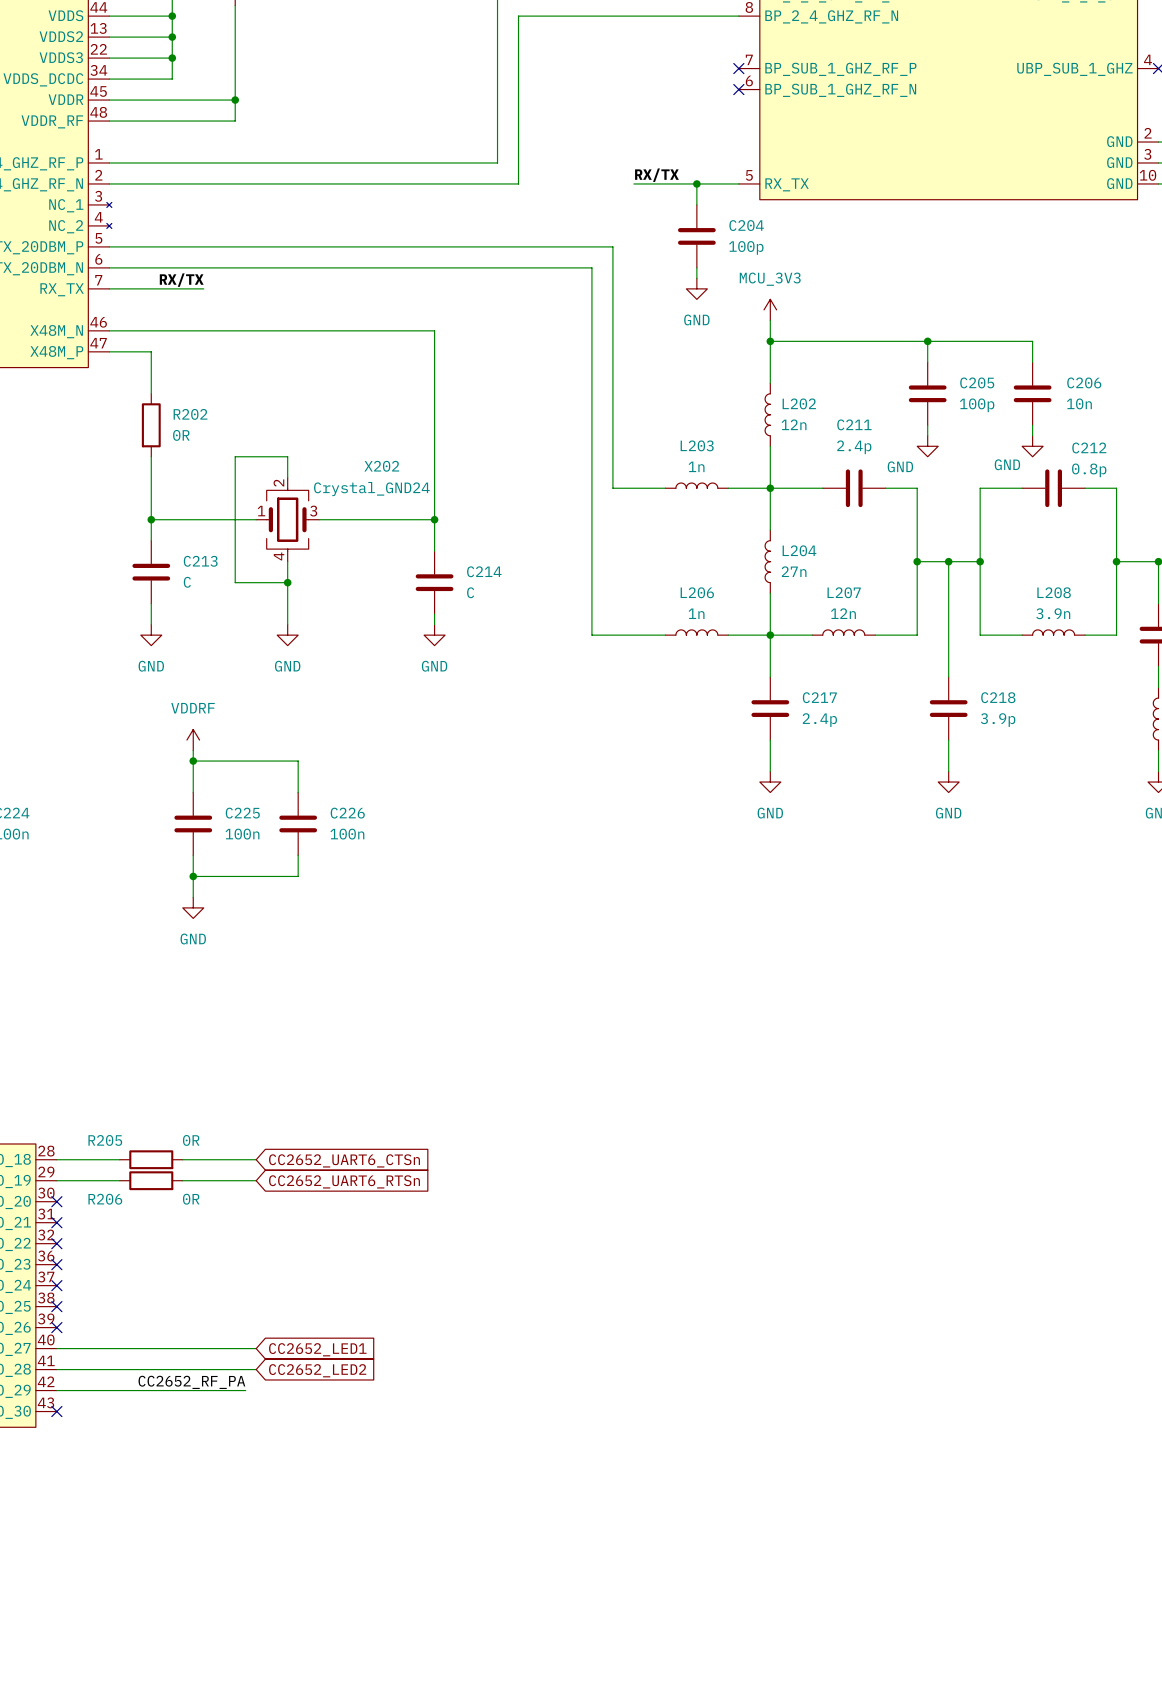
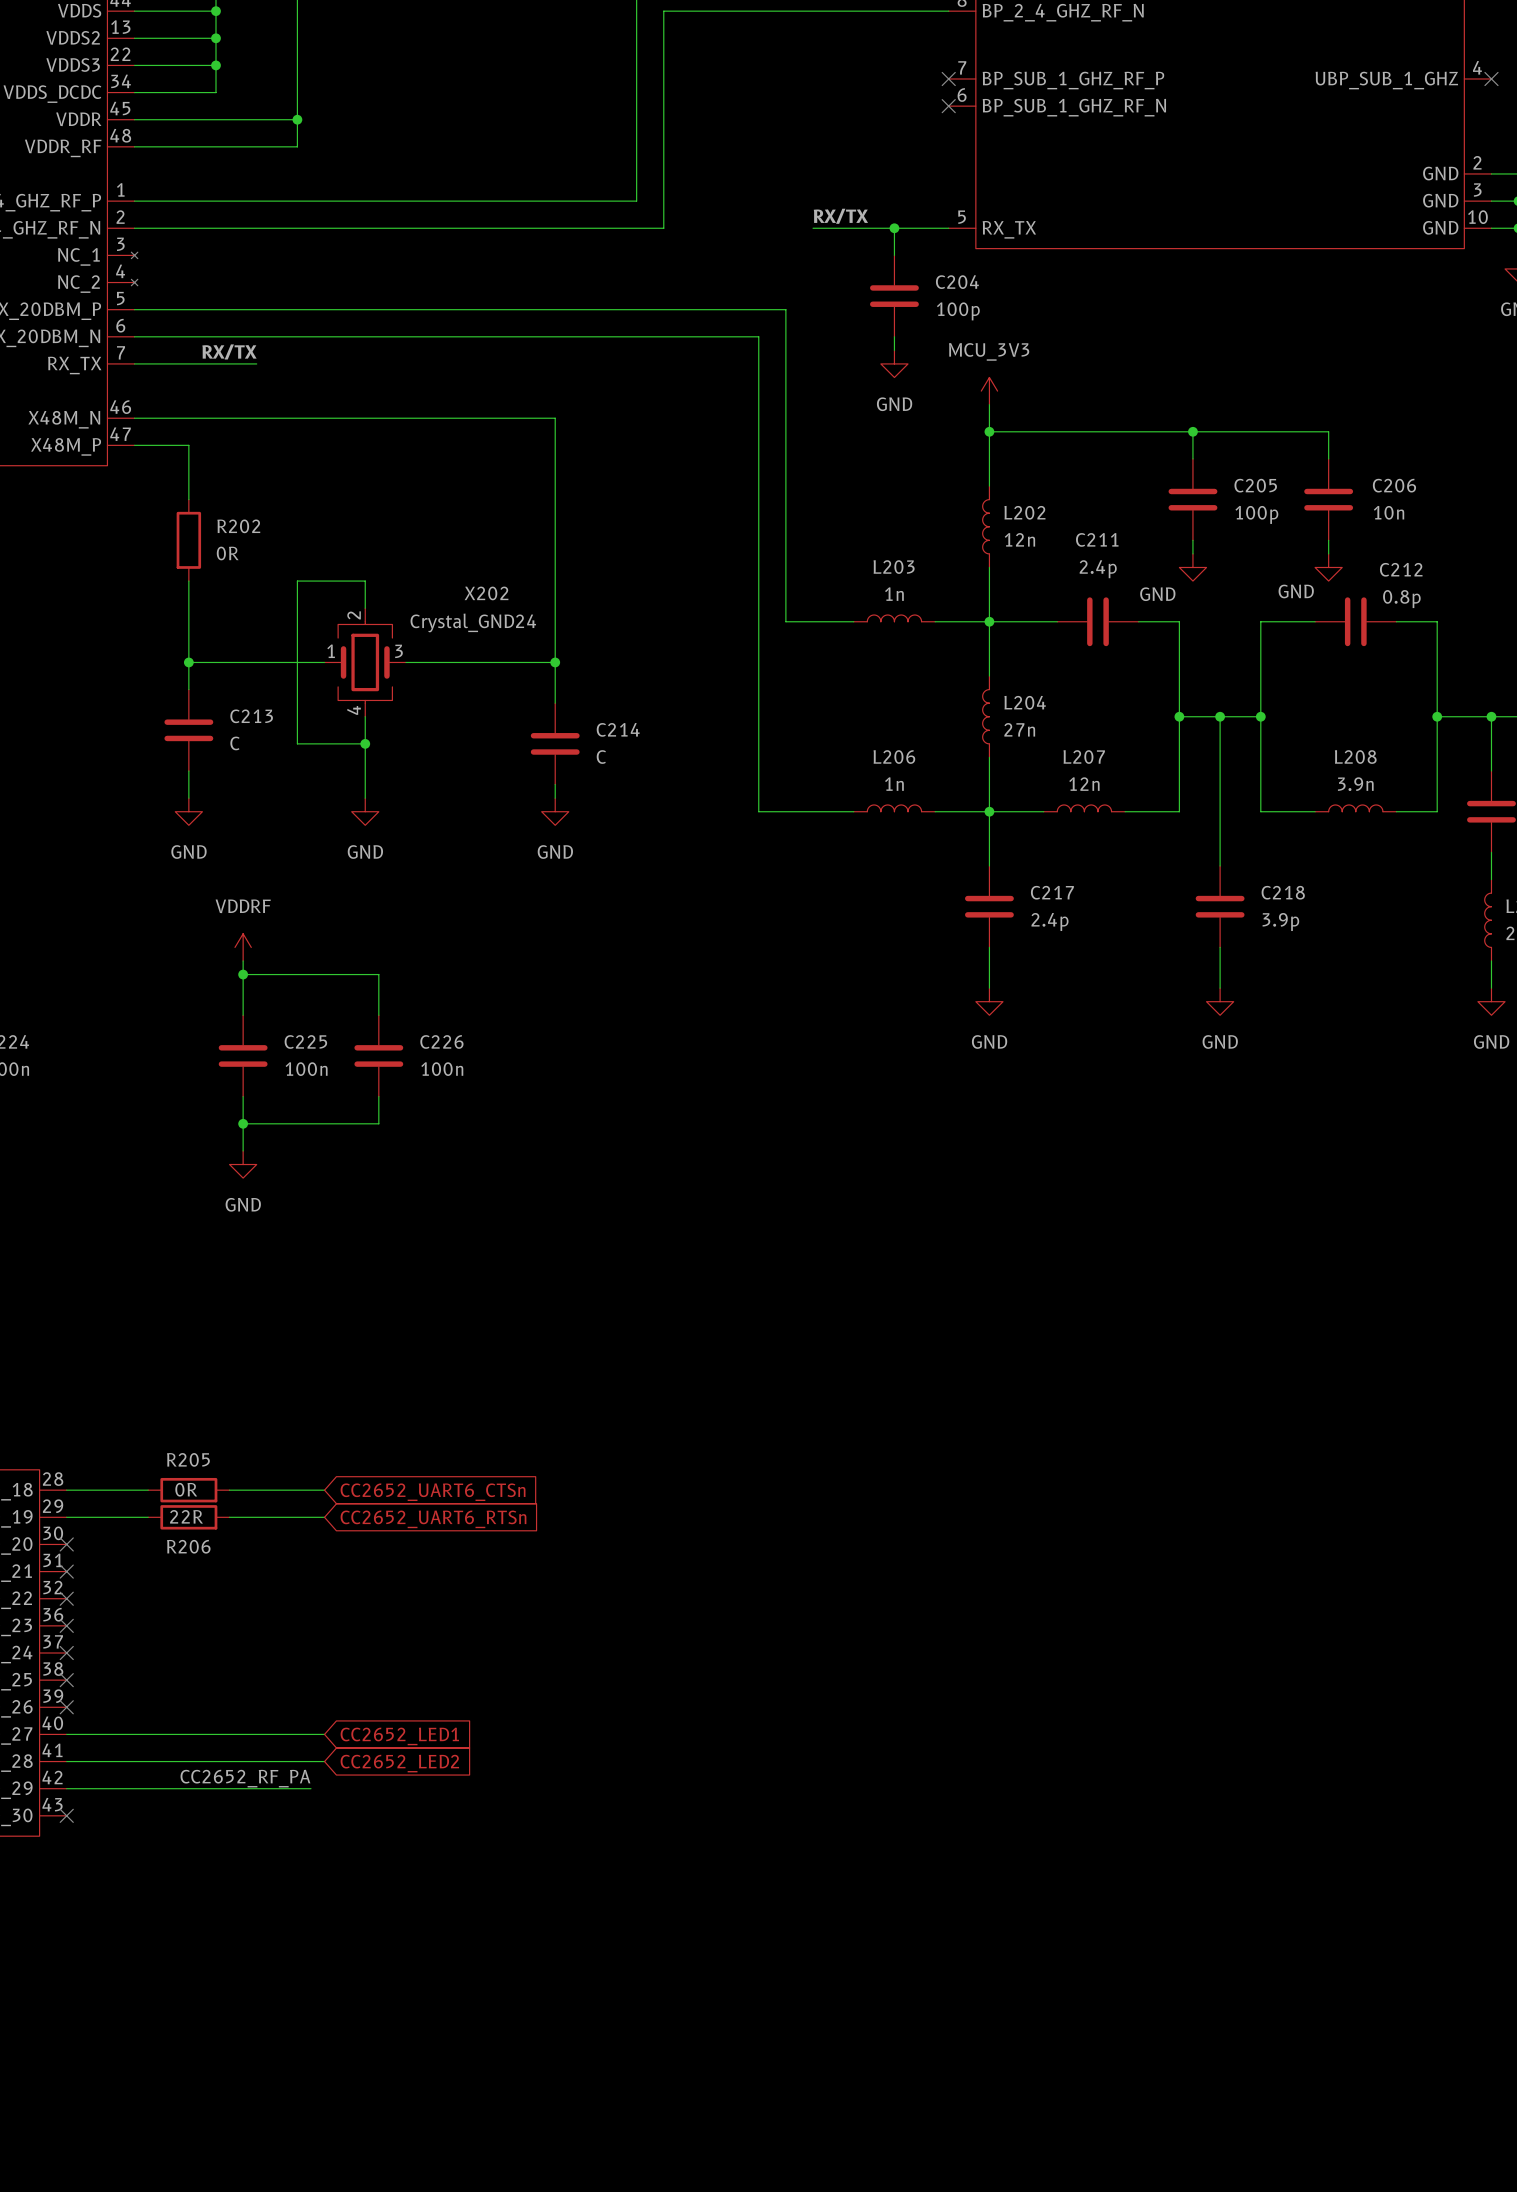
R205 name position: R205 (105, 1140) -> R205 (188, 1459)
R205 value position: 0R (191, 1140) -> 0R (186, 1489)
R206 name position: R206 (105, 1199) -> R206 (188, 1546)
R206 value: 0R (191, 1199) -> 22R (186, 1516)

